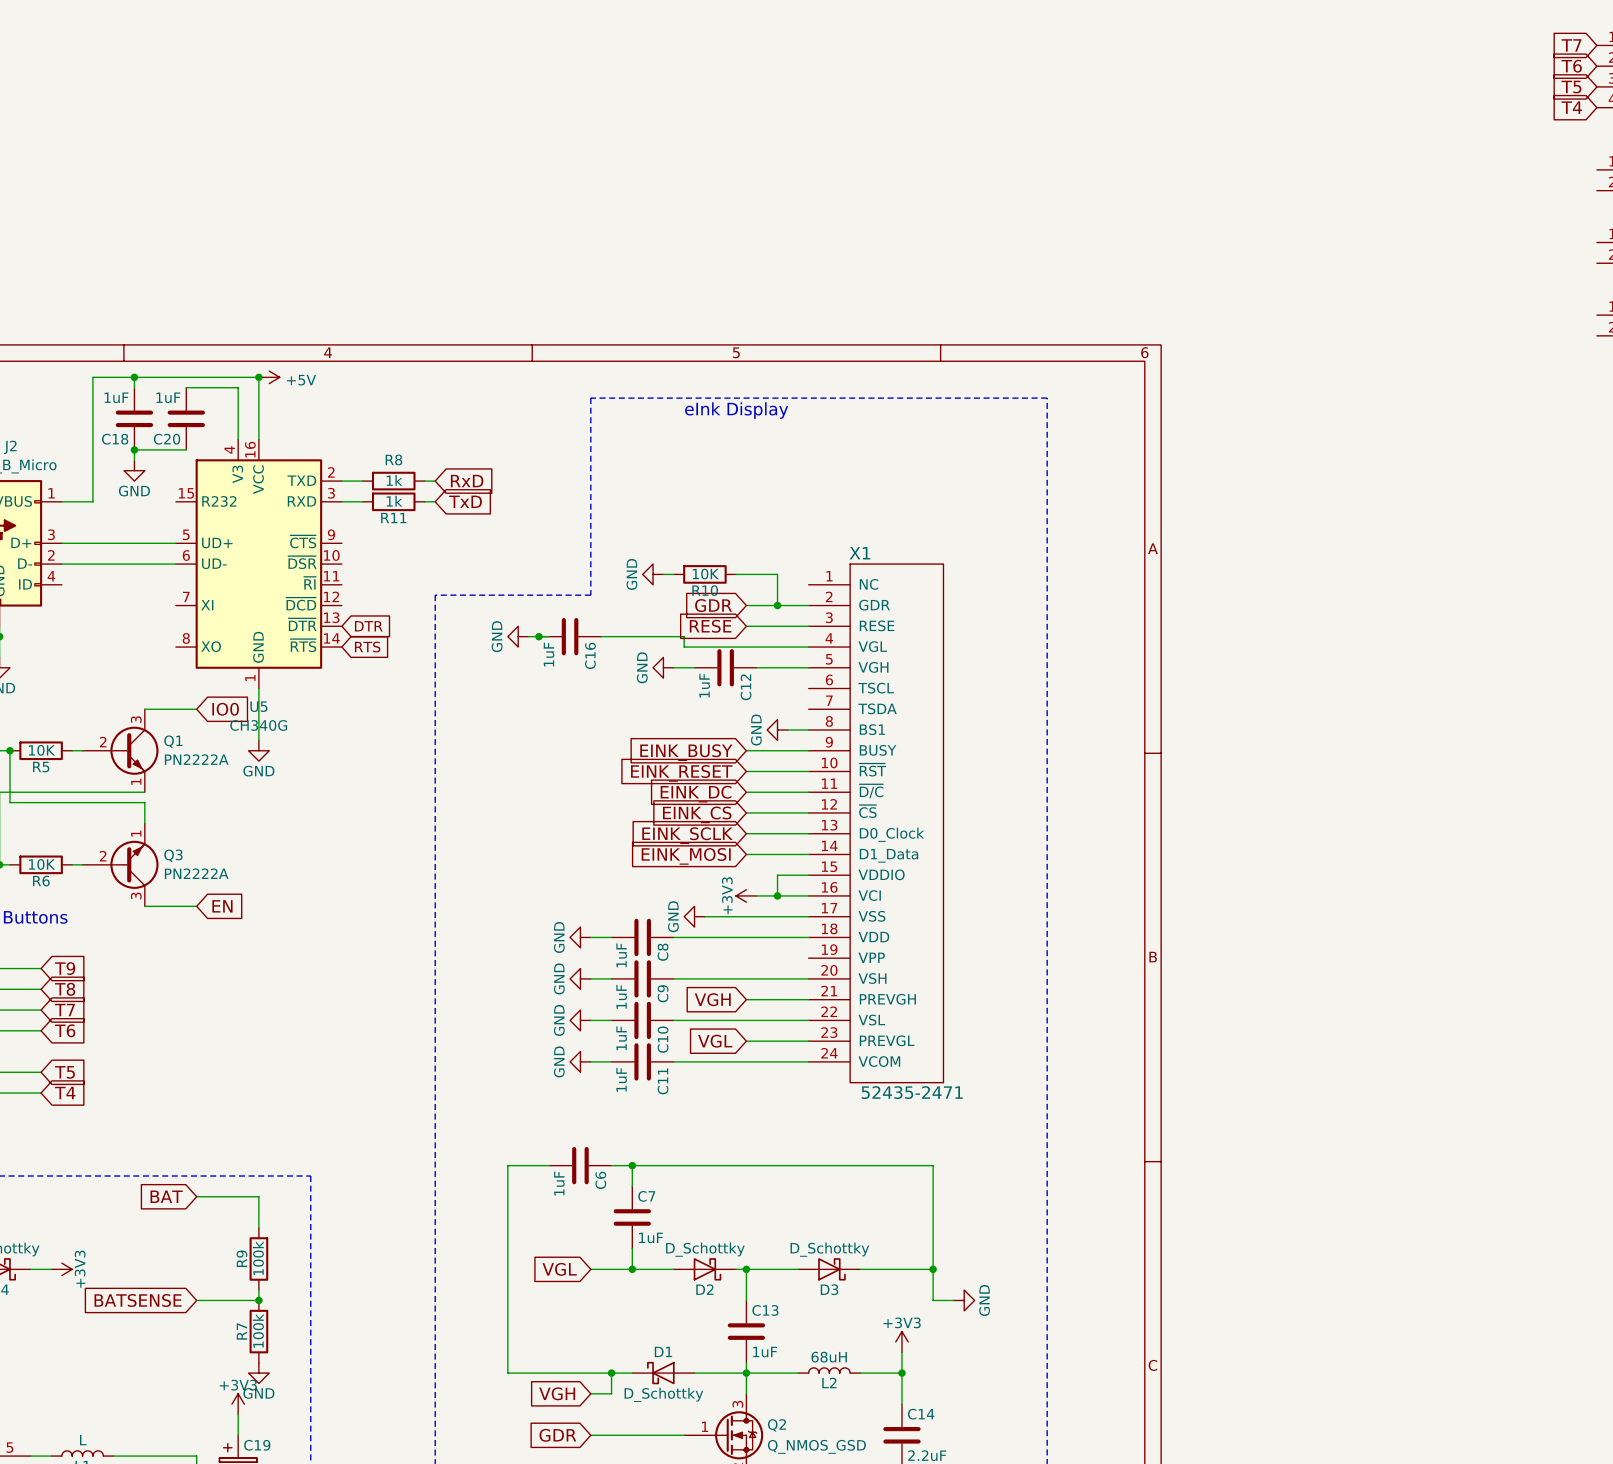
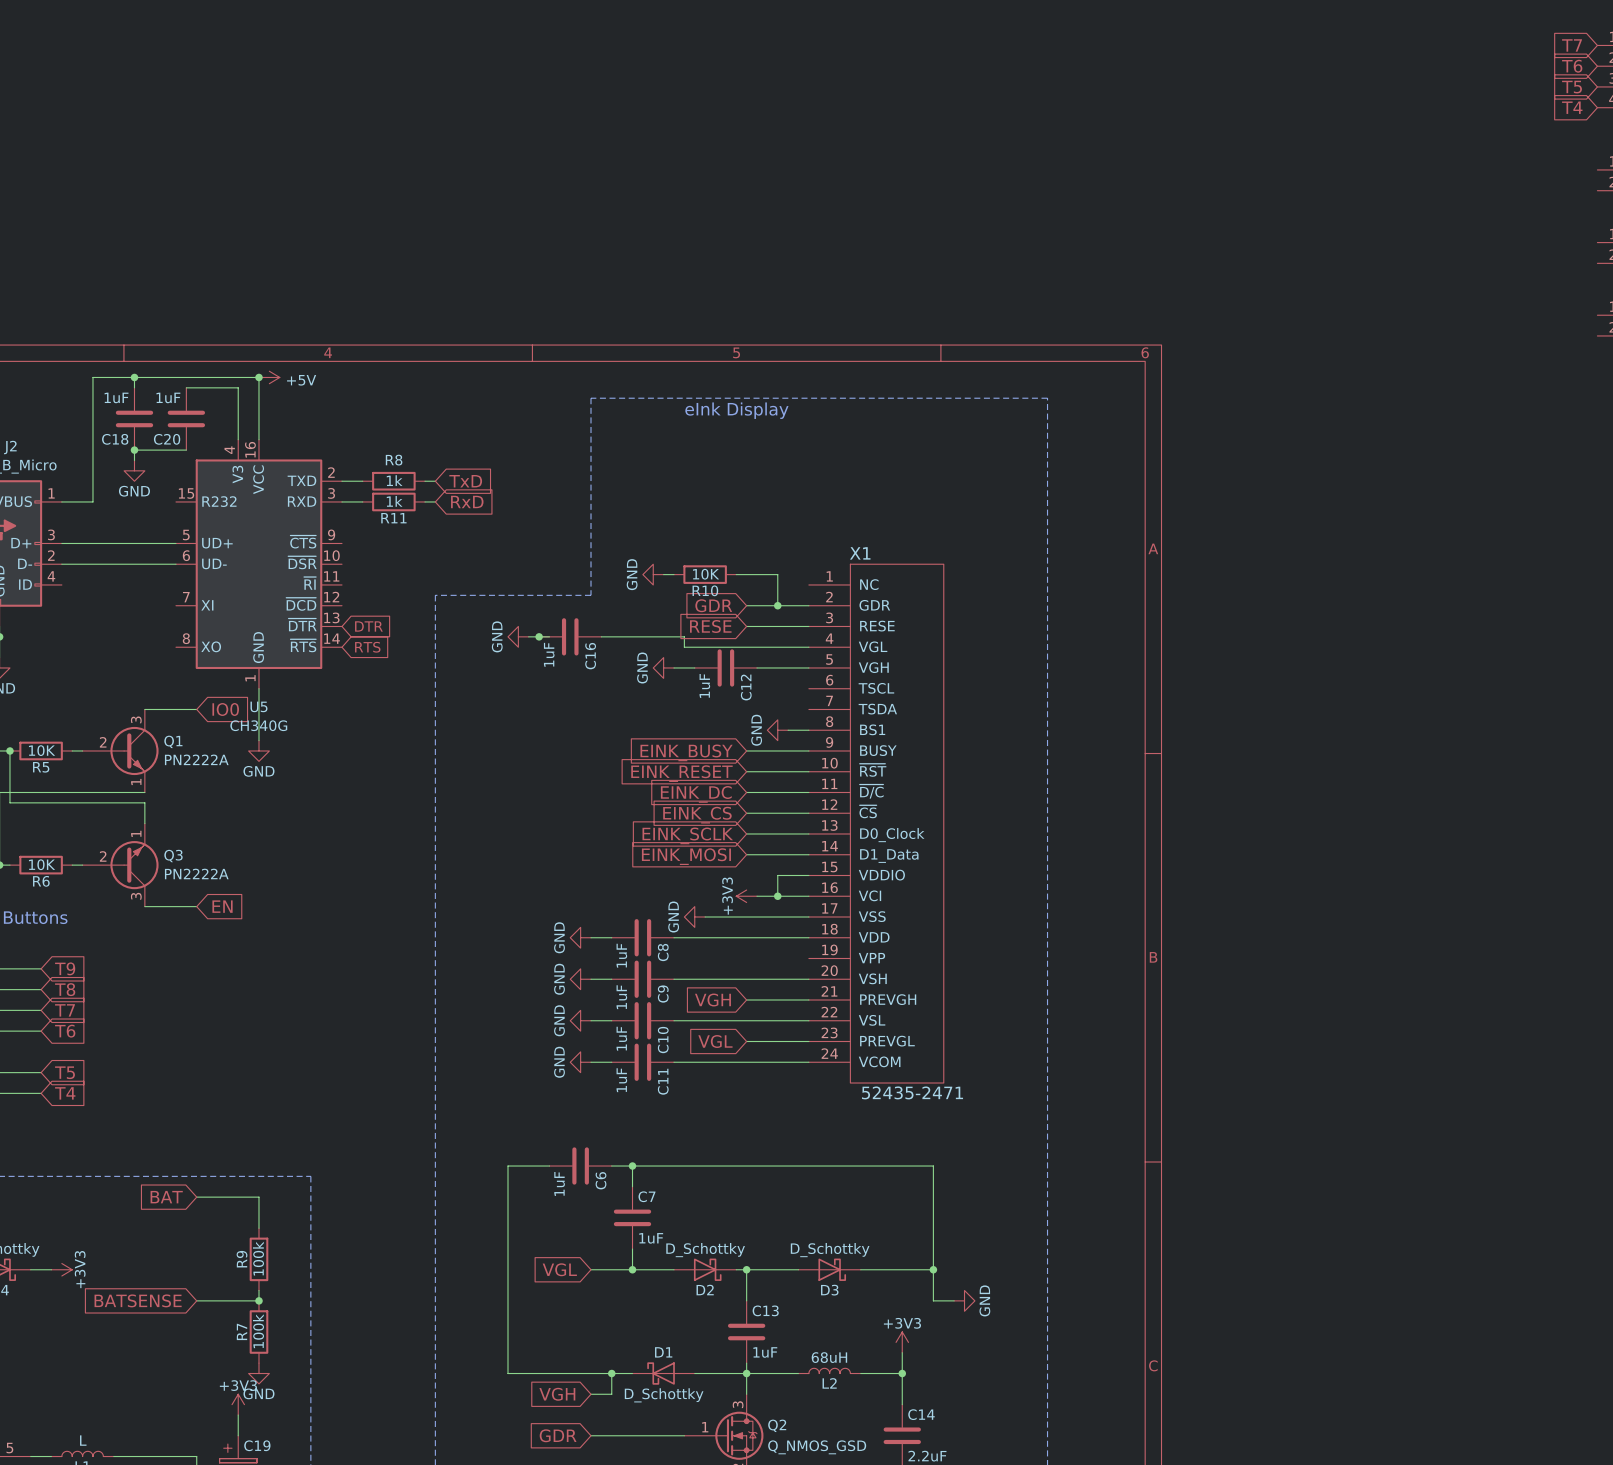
global label: RxD (467, 481) -> TxD (465, 481)
global label: TxD (465, 501) -> RxD (467, 501)

